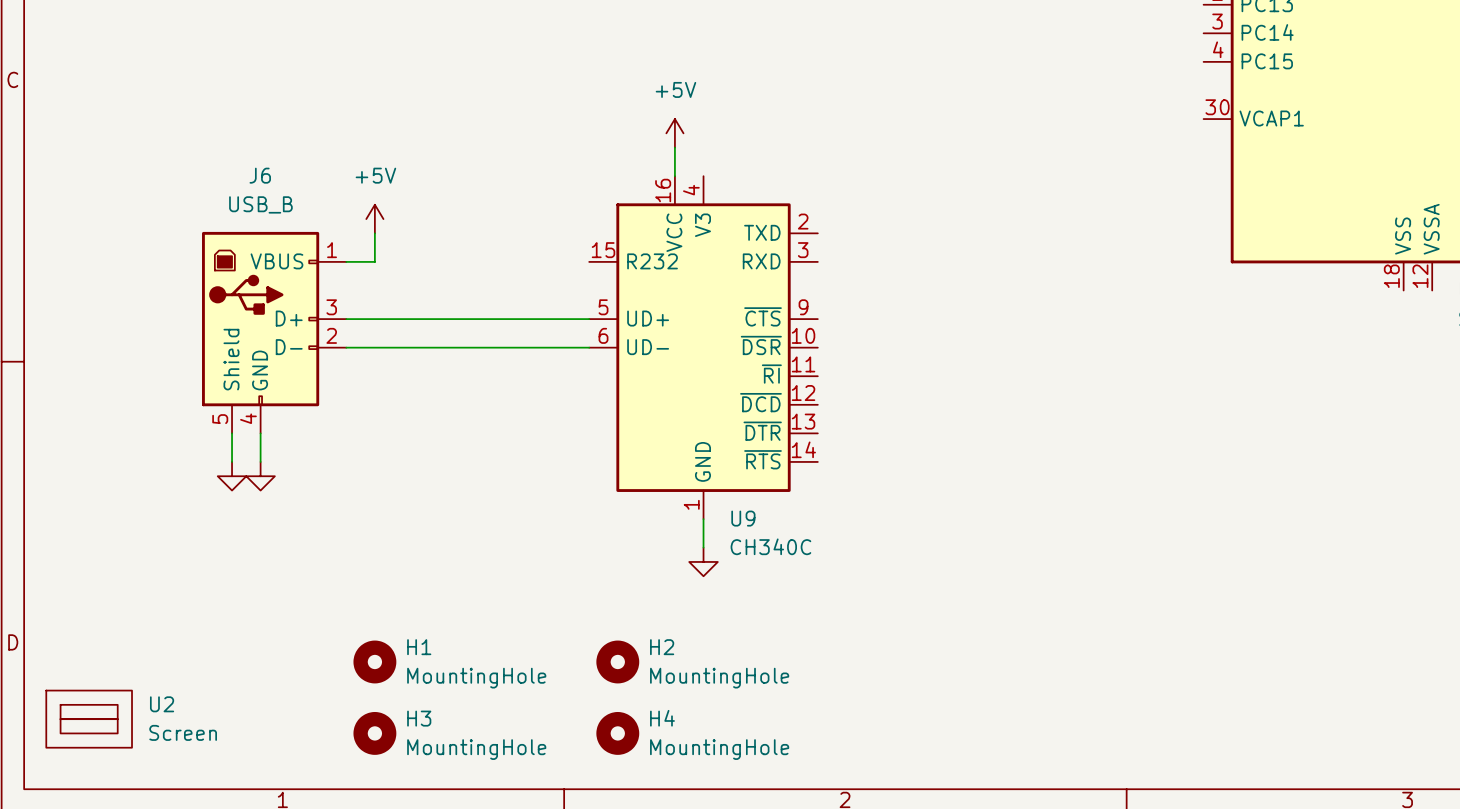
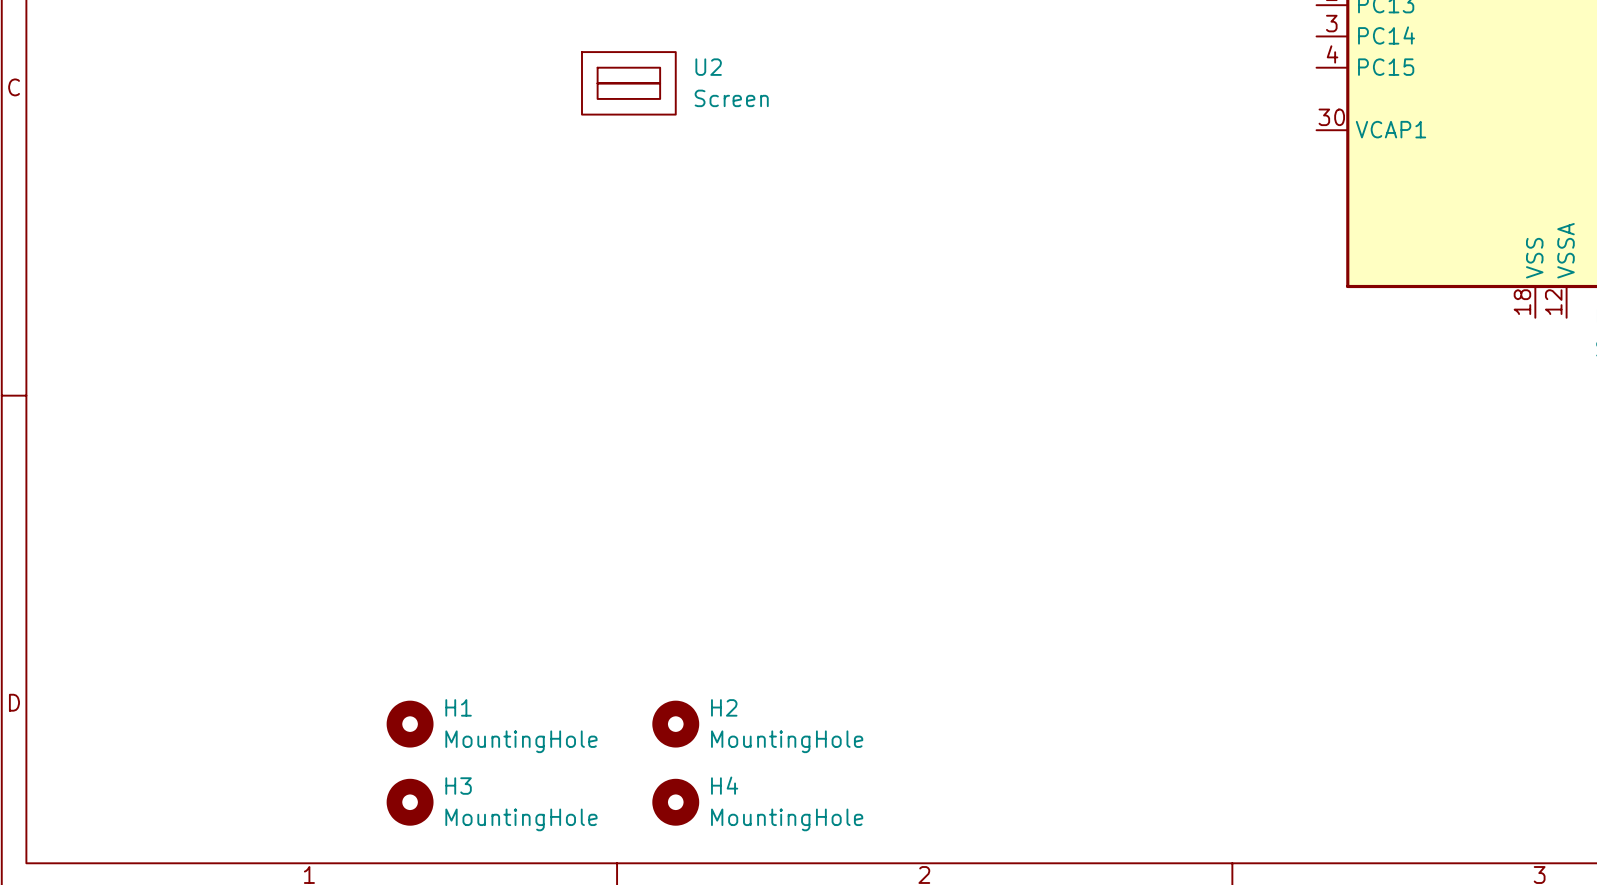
power symbol: +5V (674, 133) -> none
wire: (674, 147) (674, 176) -> none
power symbol: +5V (374, 219) -> none
wire: (374, 233) (374, 261) (346, 261) -> none
wire: (346, 319) (589, 319) -> none
J6: USB_B (274, 332) -> none
wire: (346, 347) (589, 347) -> none
U9: CH340C (703, 347) -> none
wire: (232, 433) (232, 461) -> none
wire: (260, 433) (260, 461) -> none
power symbol: (232, 476) -> none
power symbol: (260, 476) -> none
wire: (703, 519) (703, 547) -> none
power symbol: (703, 561) -> none
U2 position: (89, 719) -> (628, 83)

